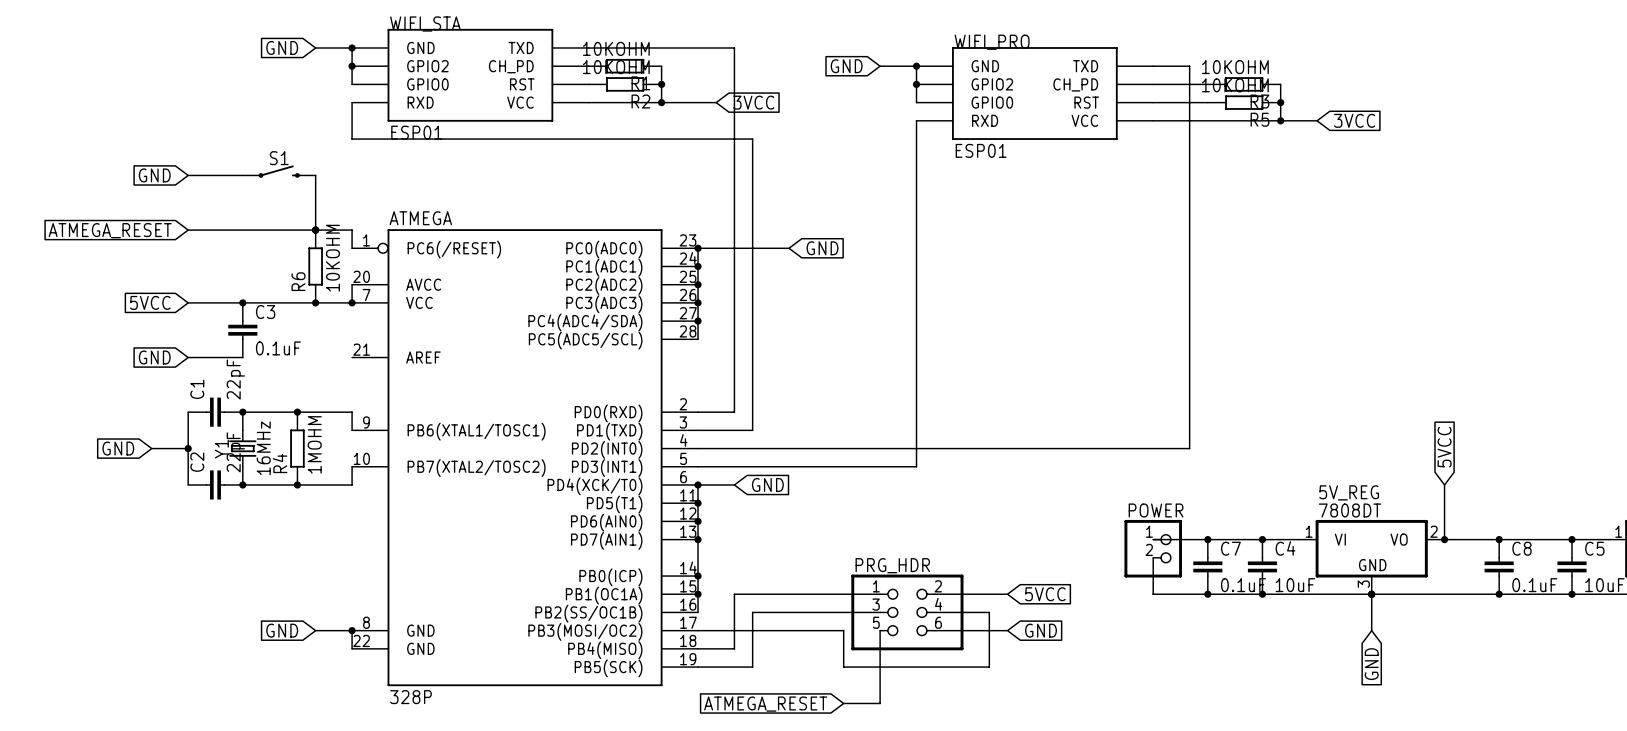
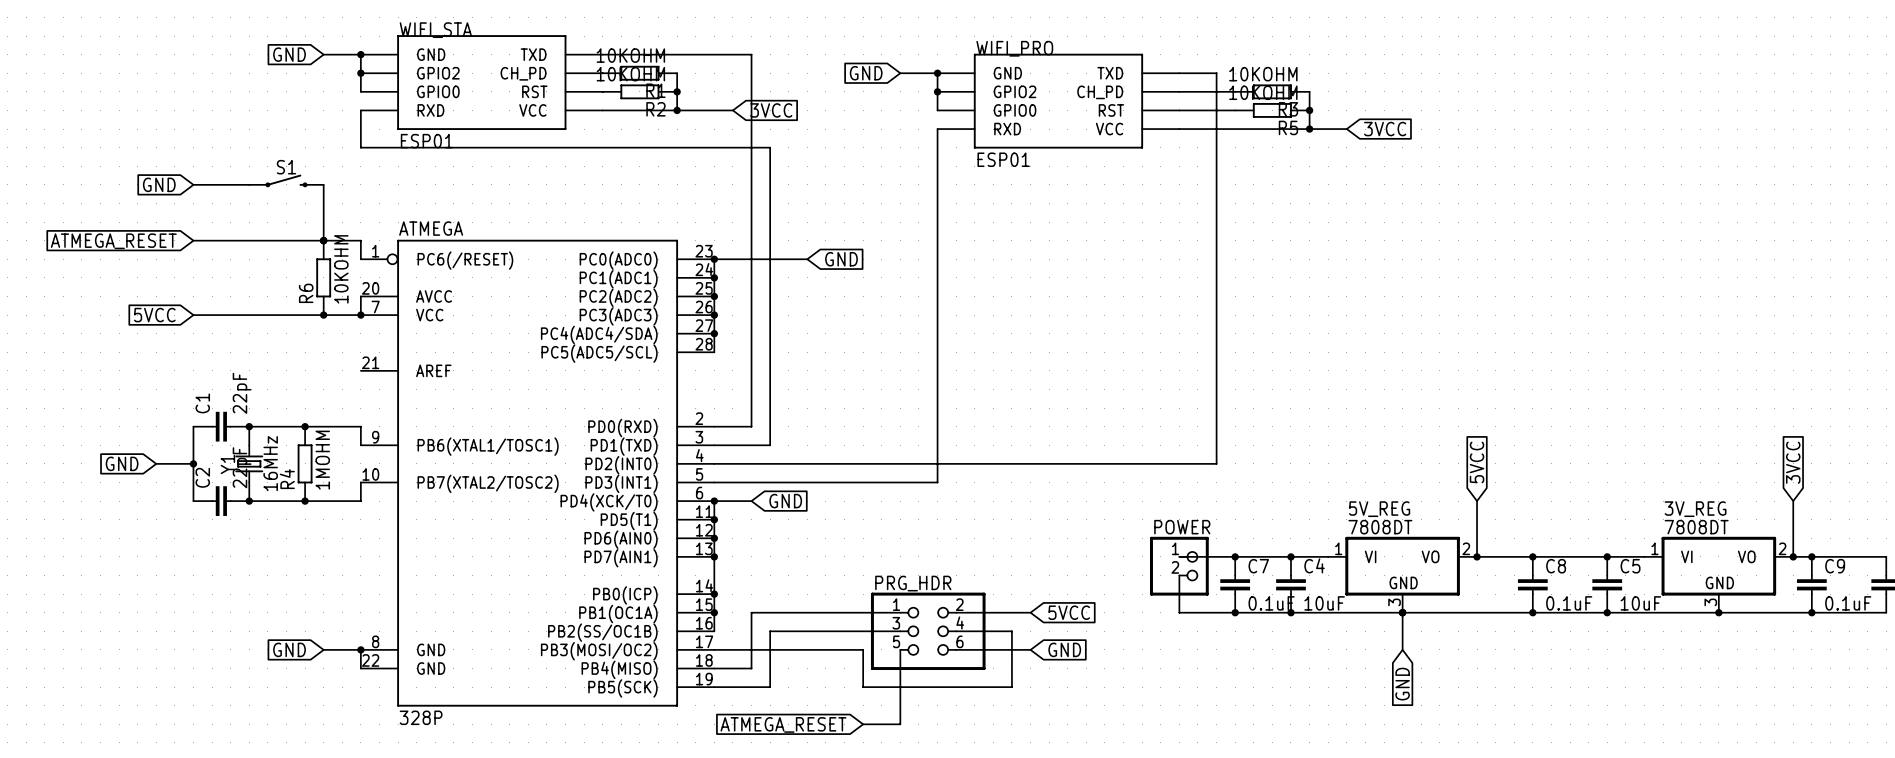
junction: (242, 302) -> none
C3: 0.1uF (242, 330) -> none
global label: GND (154, 357) -> none
wire: (188, 357) (242, 357) -> none

